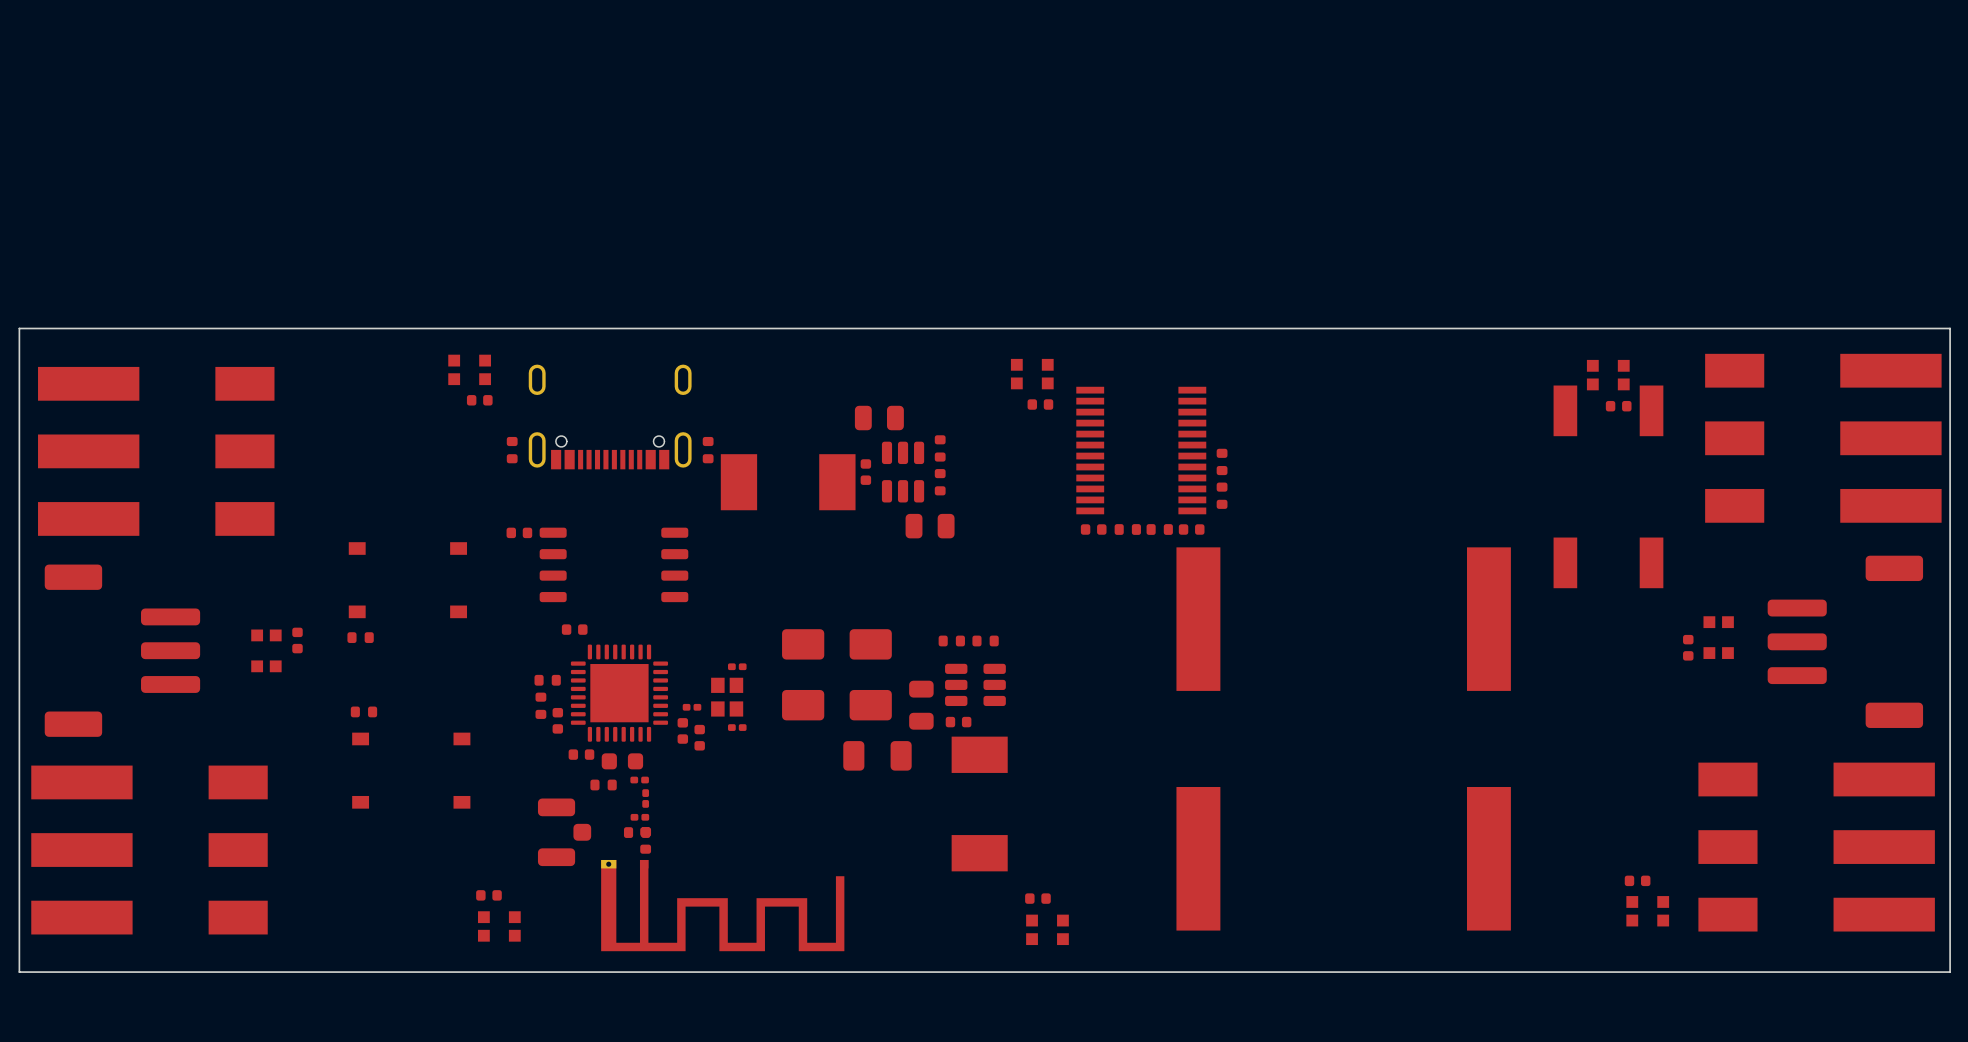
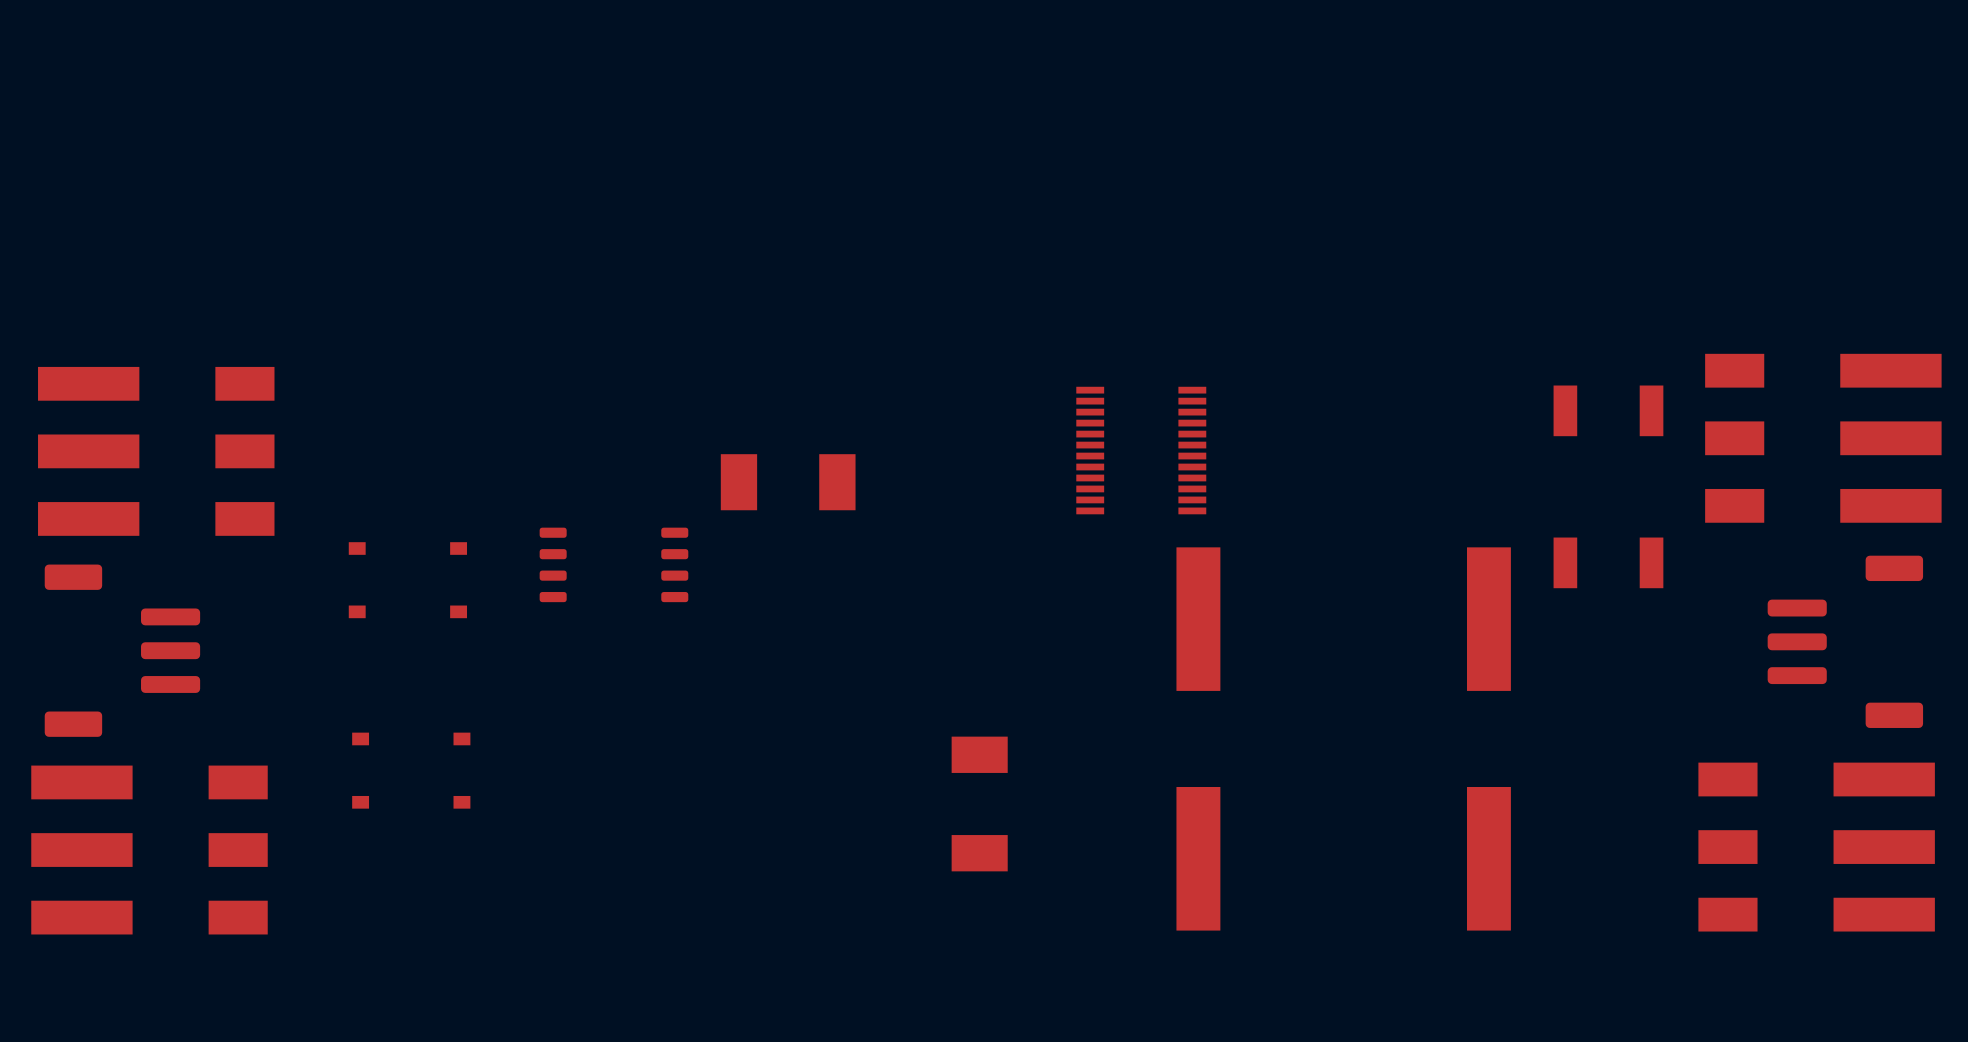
board edge: (1950, 328) (1950, 972) (19, 972) (19, 328) (1950, 328) -> none
part: (469, 369) -> none
part: (1032, 374) -> none
part: (1608, 375) -> none
part: (479, 400) -> none
part: (1040, 404) -> none
part: (1618, 406) -> none
part: (610, 416) -> none
part: (879, 418) -> none
part: (940, 448) -> none
part: (512, 450) -> none
part: (708, 450) -> none
part: (1222, 461) -> none
part: (865, 472) -> none
part: (903, 472) -> none
part: (940, 482) -> none
part: (1222, 495) -> none
part: (930, 526) -> none
part: (1093, 529) -> none
part: (1127, 529) -> none
part: (1159, 529) -> none
part: (1191, 529) -> none
part: (519, 532) -> none
part: (574, 629) -> none
part: (360, 637) -> none
part: (1718, 637) -> none
part: (297, 640) -> none
part: (951, 640) -> none
part: (985, 640) -> none
part: (836, 644) -> none
part: (1688, 647) -> none
part: (266, 650) -> none
part: (737, 666) -> none
part: (547, 680) -> none
part: (975, 684) -> none
part: (619, 693) -> none
part: (727, 697) -> none
part: (540, 705) -> none
part: (836, 705) -> none
part: (921, 705) -> none
part: (692, 707) -> none
part: (363, 711) -> none
part: (557, 720) -> none
part: (958, 722) -> none
part: (737, 727) -> none
part: (682, 730) -> none
part: (699, 737) -> none
part: (581, 754) -> none
part: (877, 755) -> none
part: (622, 761) -> none
part: (639, 780) -> none
part: (603, 784) -> none
part: (645, 798) -> none
part: (639, 817) -> none
part: (564, 832) -> none
part: (637, 832) -> none
part: (645, 840) -> none
part: (1637, 880) -> none
part: (488, 895) -> none
part: (1037, 898) -> none
part: (722, 905) -> none
part: (1647, 911) -> none
part: (499, 926) -> none
part: (1047, 929) -> none

